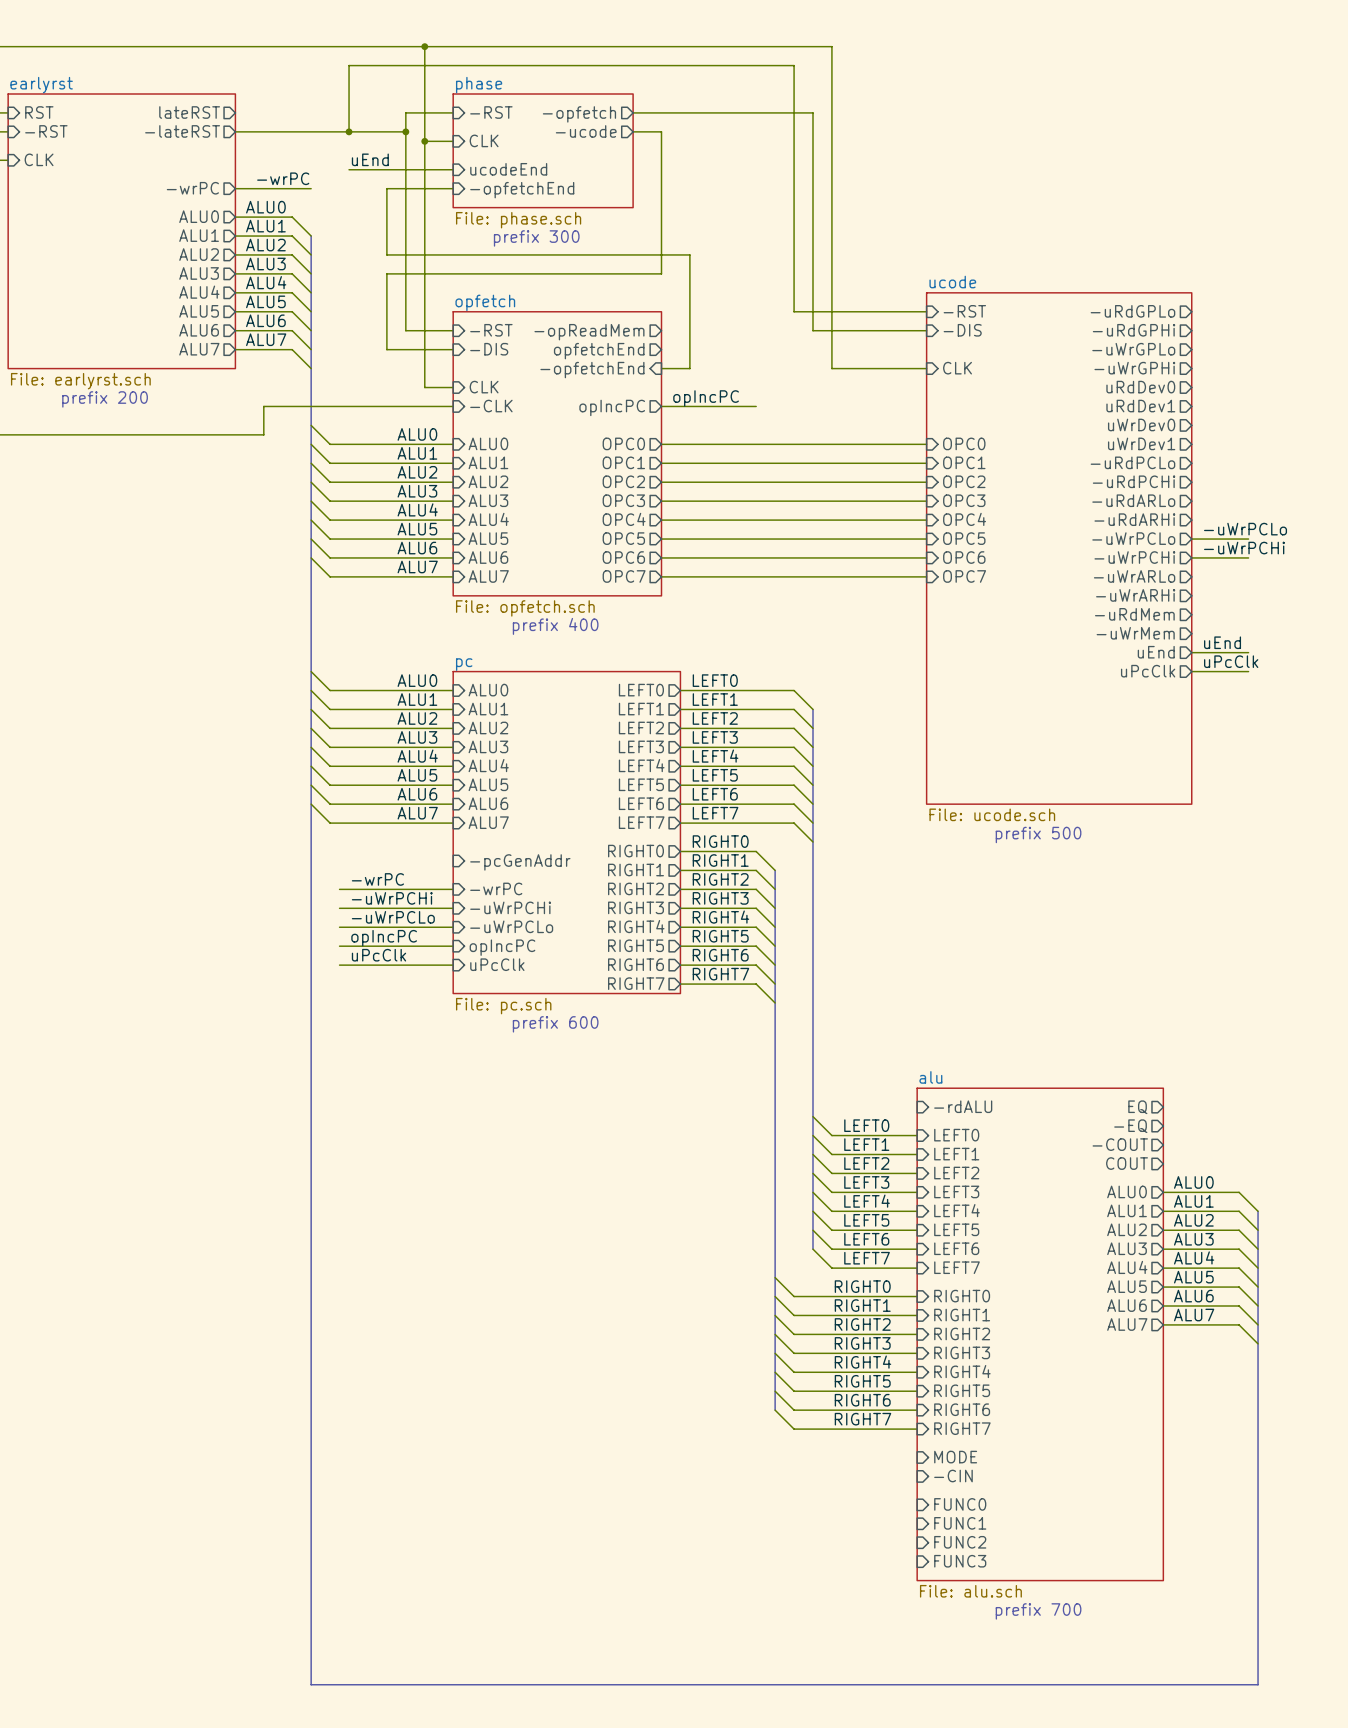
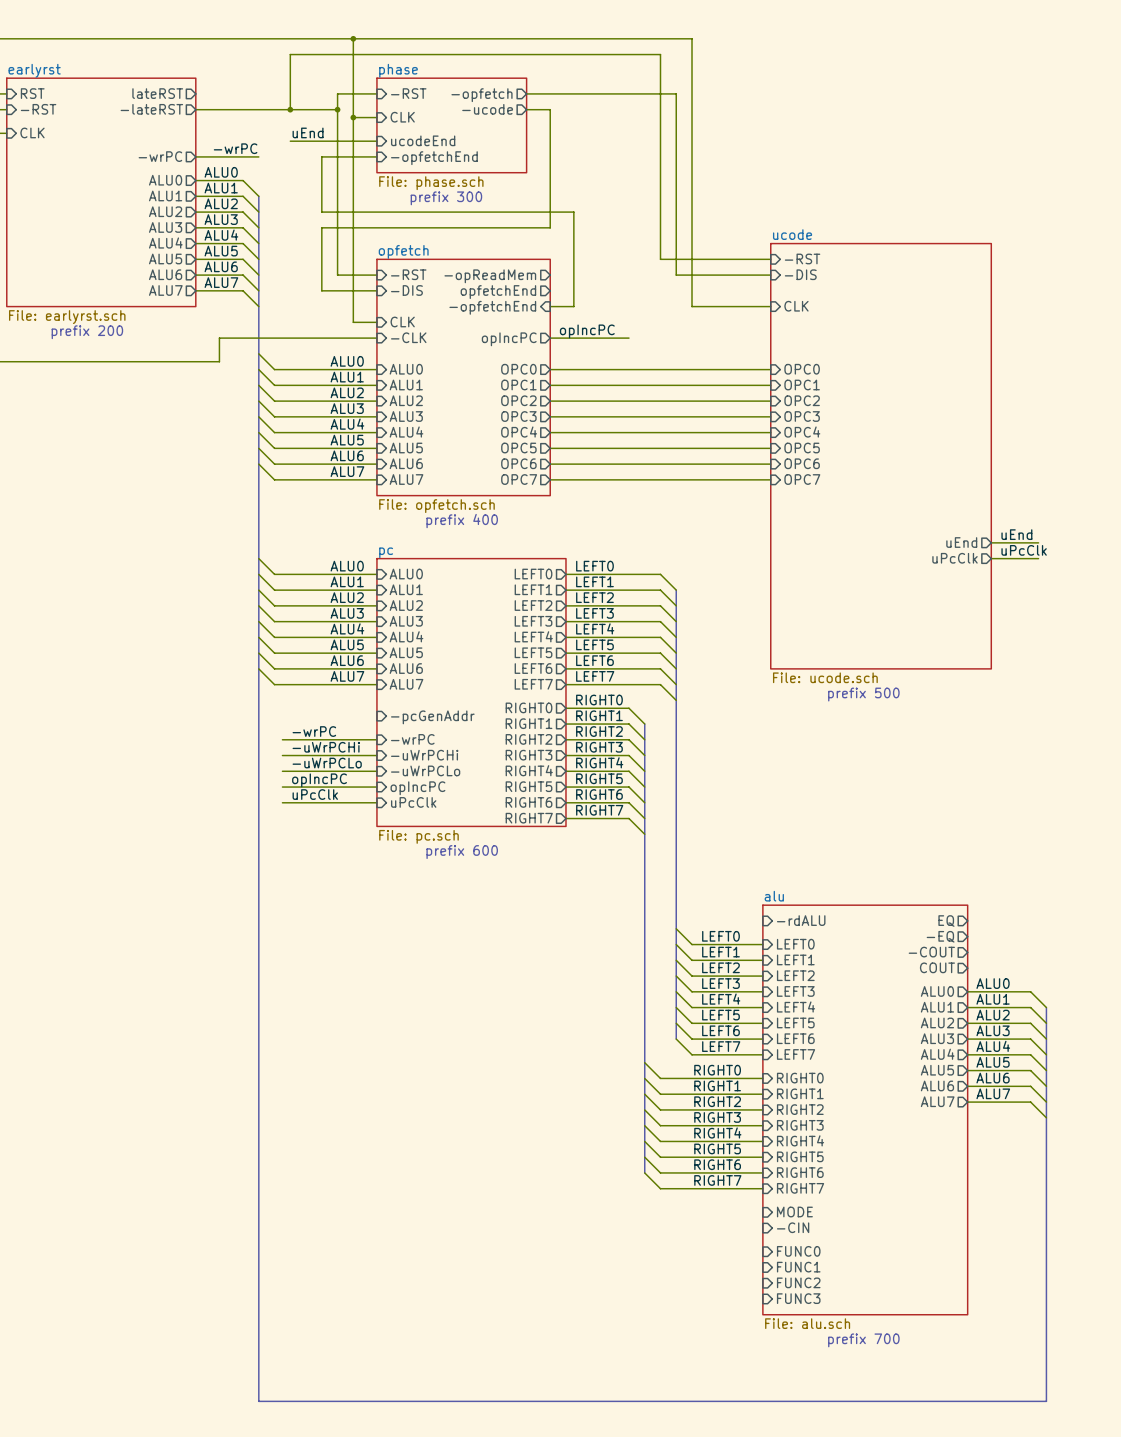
sheet pin: -uRdGPLo (1132, 311) -> none
sheet pin: -uRdGPHi (1134, 330) -> none
sheet pin: -uWrGPLo (1133, 349) -> none
sheet pin: -uWrGPHi (1134, 368) -> none
sheet pin: uRdDev0 (1140, 387) -> none
sheet pin: uRdDev1 (1140, 406) -> none
sheet pin: uWrDev0 (1141, 424) -> none
sheet pin: uWrDev1 (1141, 443) -> none
sheet pin: -uRdPCLo (1132, 462) -> none
sheet pin: -uRdPCHi (1134, 481) -> none
sheet pin: -uRdARLo (1133, 500) -> none
sheet pin: -uRdARHi (1134, 519) -> none
label: -uWrPCLo (1245, 529) -> none
sheet pin: -uWrPCLo (1133, 538) -> none
wire: (1191, 539) (1248, 539) -> none
label: -uWrPCHi (1244, 548) -> none
sheet pin: -uWrPCHi (1134, 557) -> none
wire: (1191, 557) (1248, 557) -> none
sheet pin: -uWrARLo (1134, 576) -> none
sheet pin: -uWrARHi (1135, 595) -> none
sheet pin: -uRdMem (1134, 614) -> none
sheet pin: -uWrMem (1135, 633) -> none

